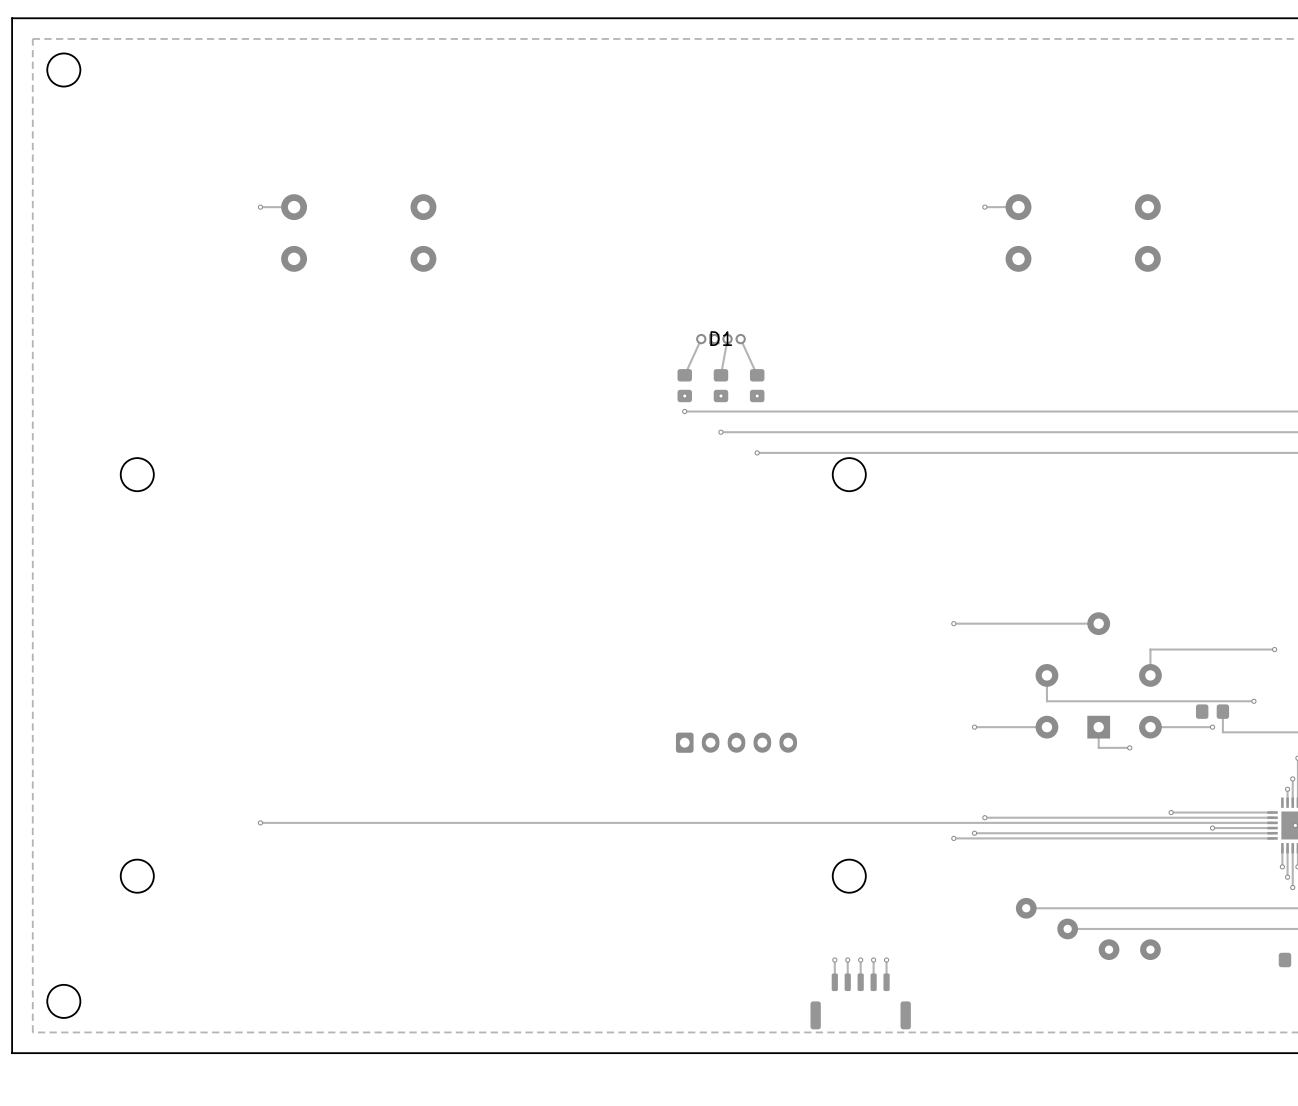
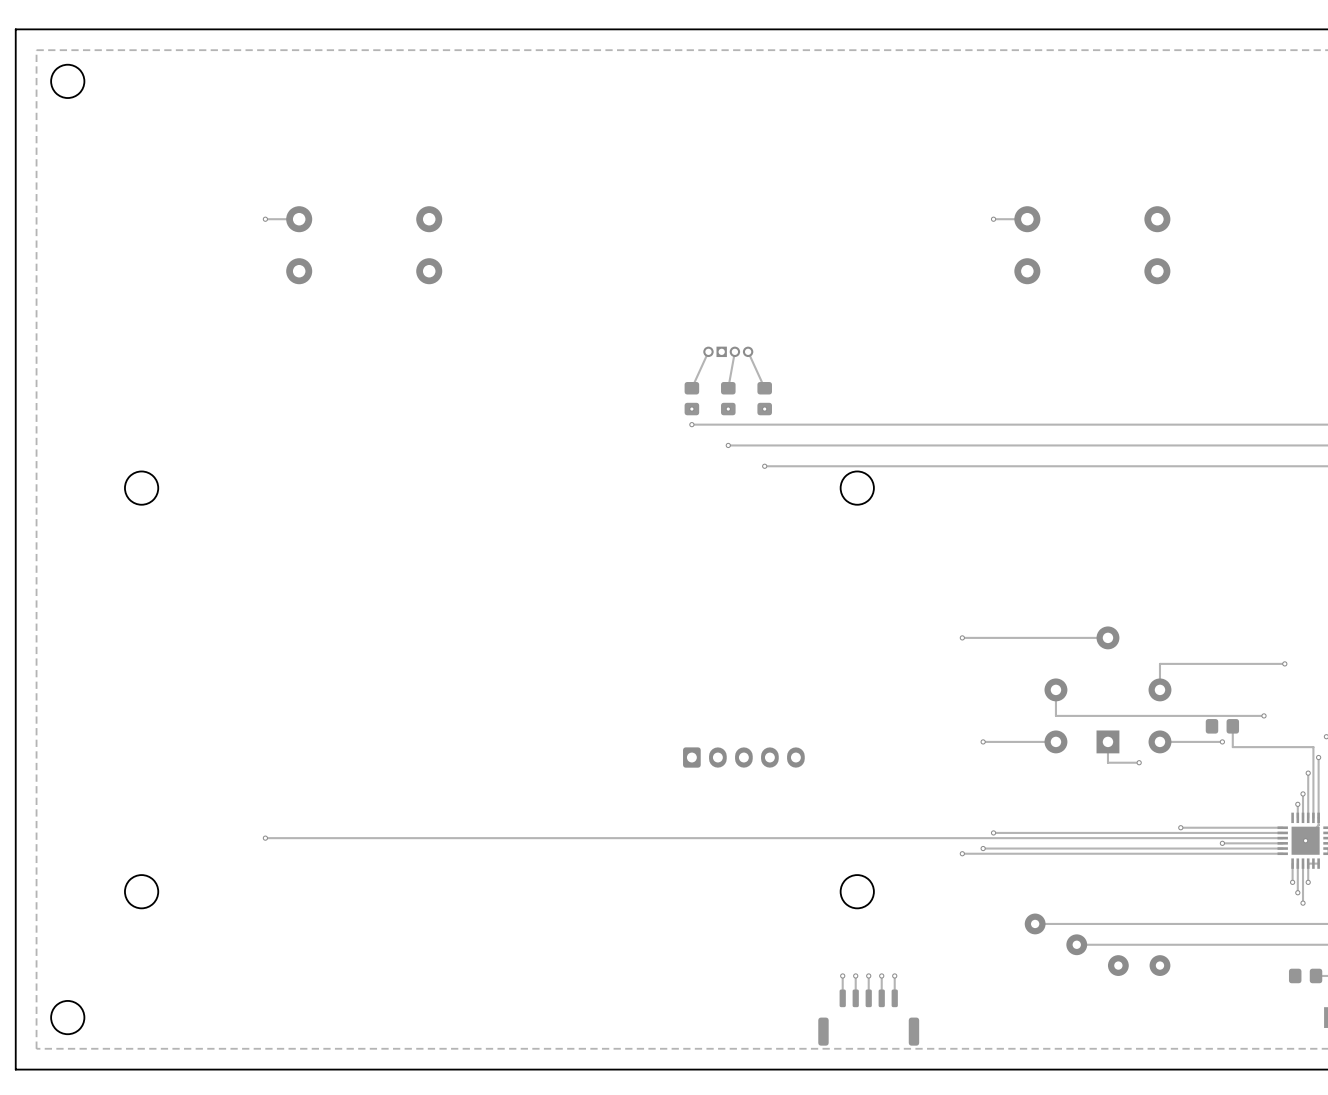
D1 name: D1 (721, 338) -> none

